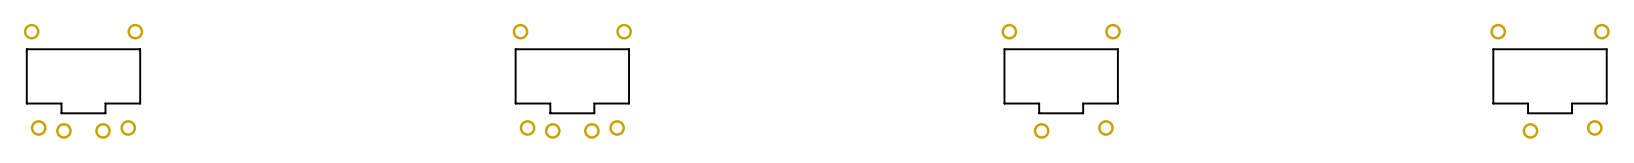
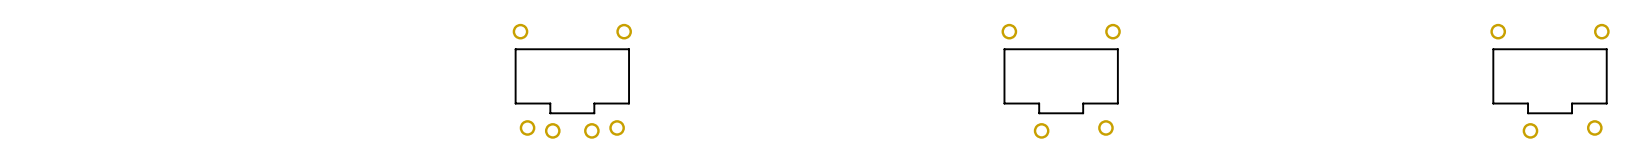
part: (83, 81) -> none

